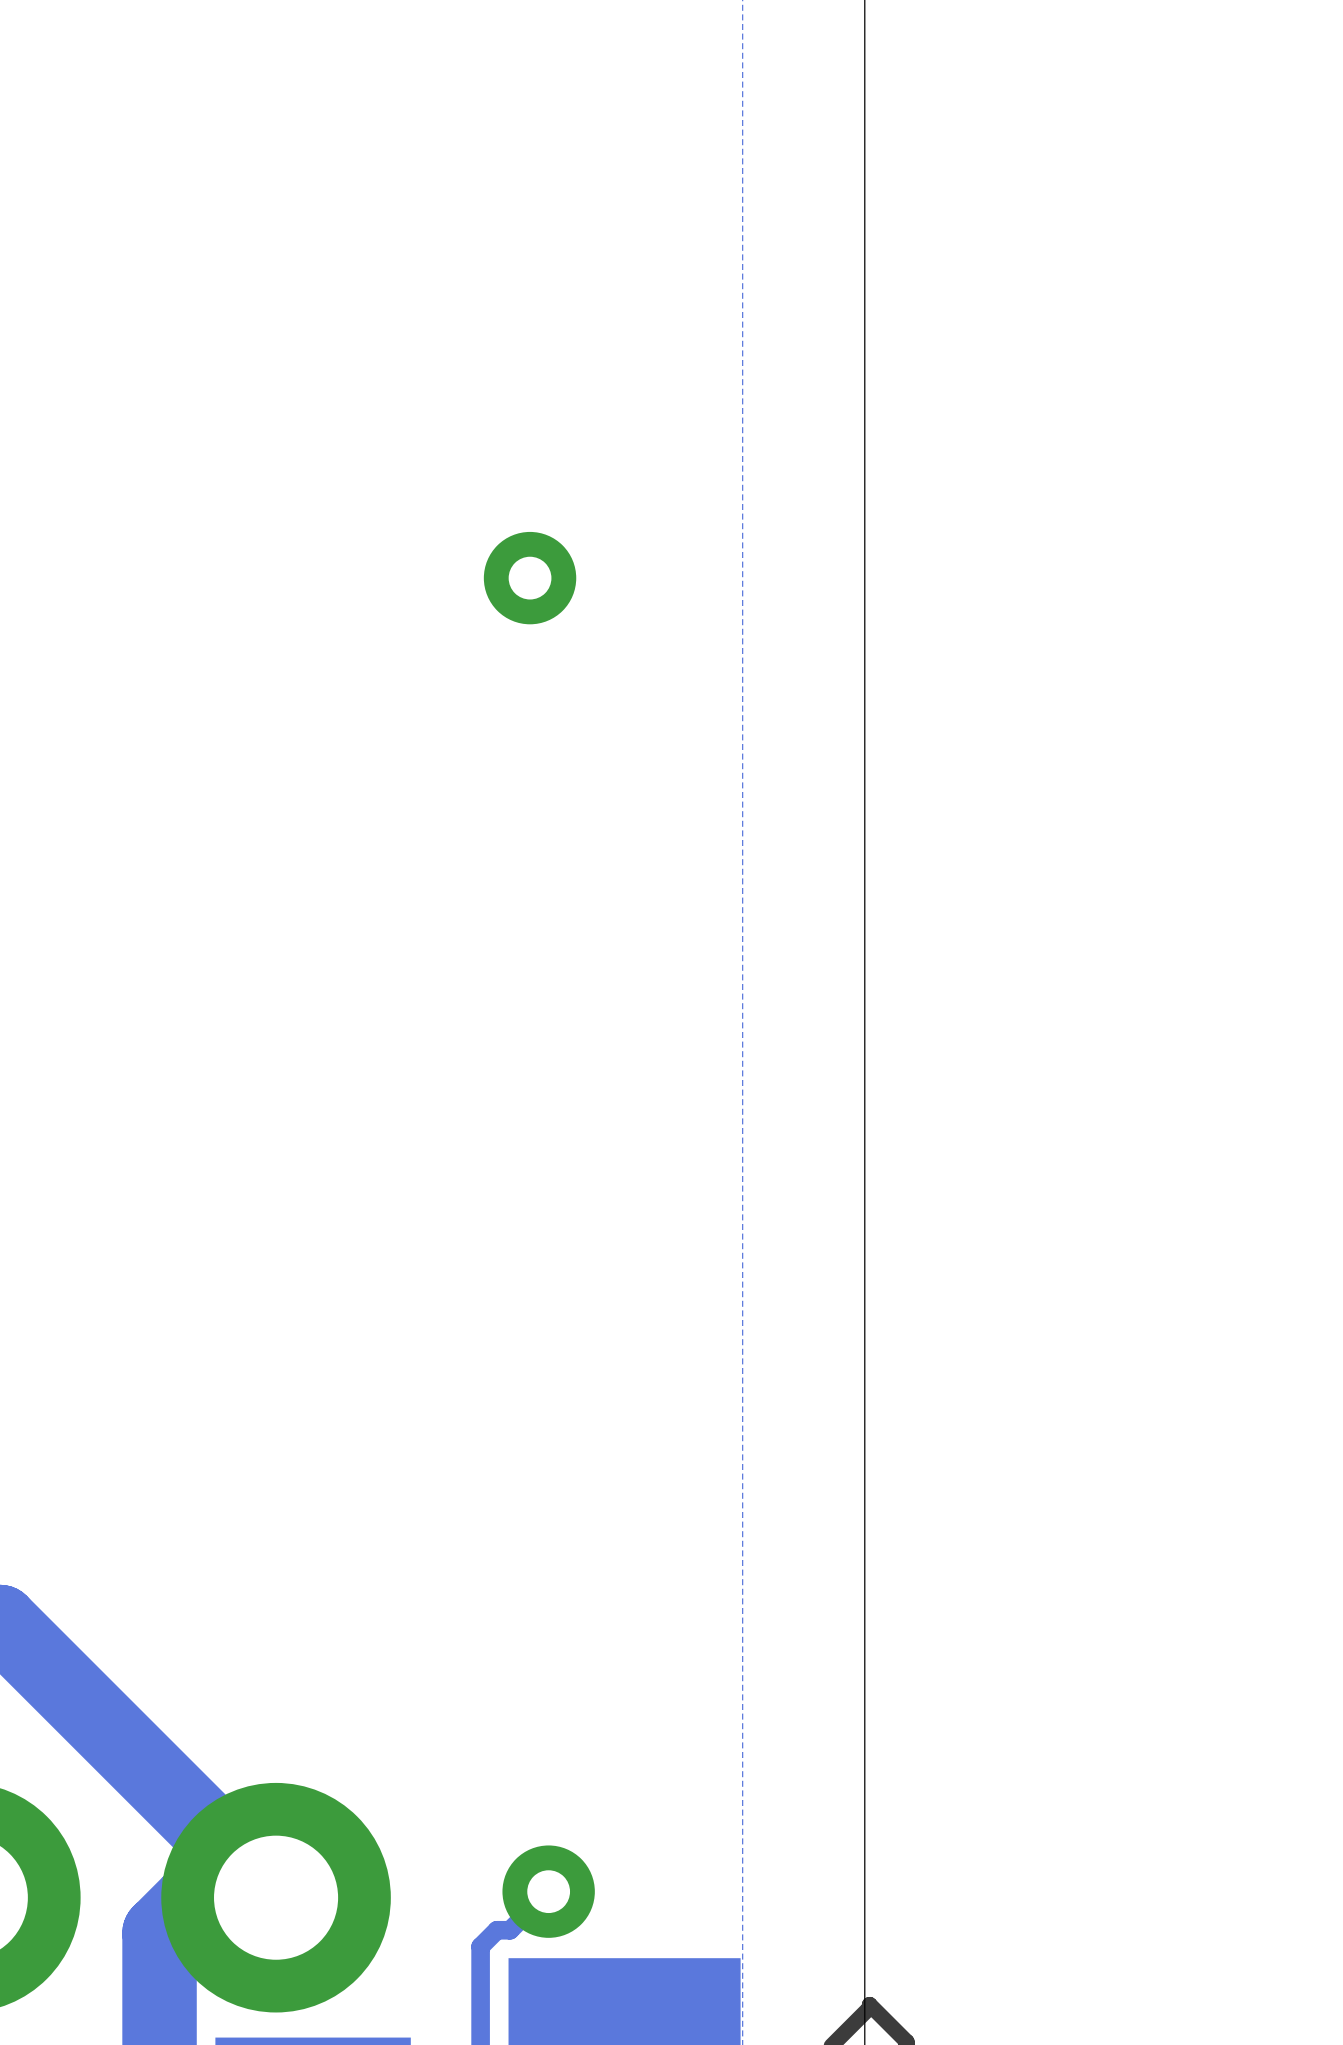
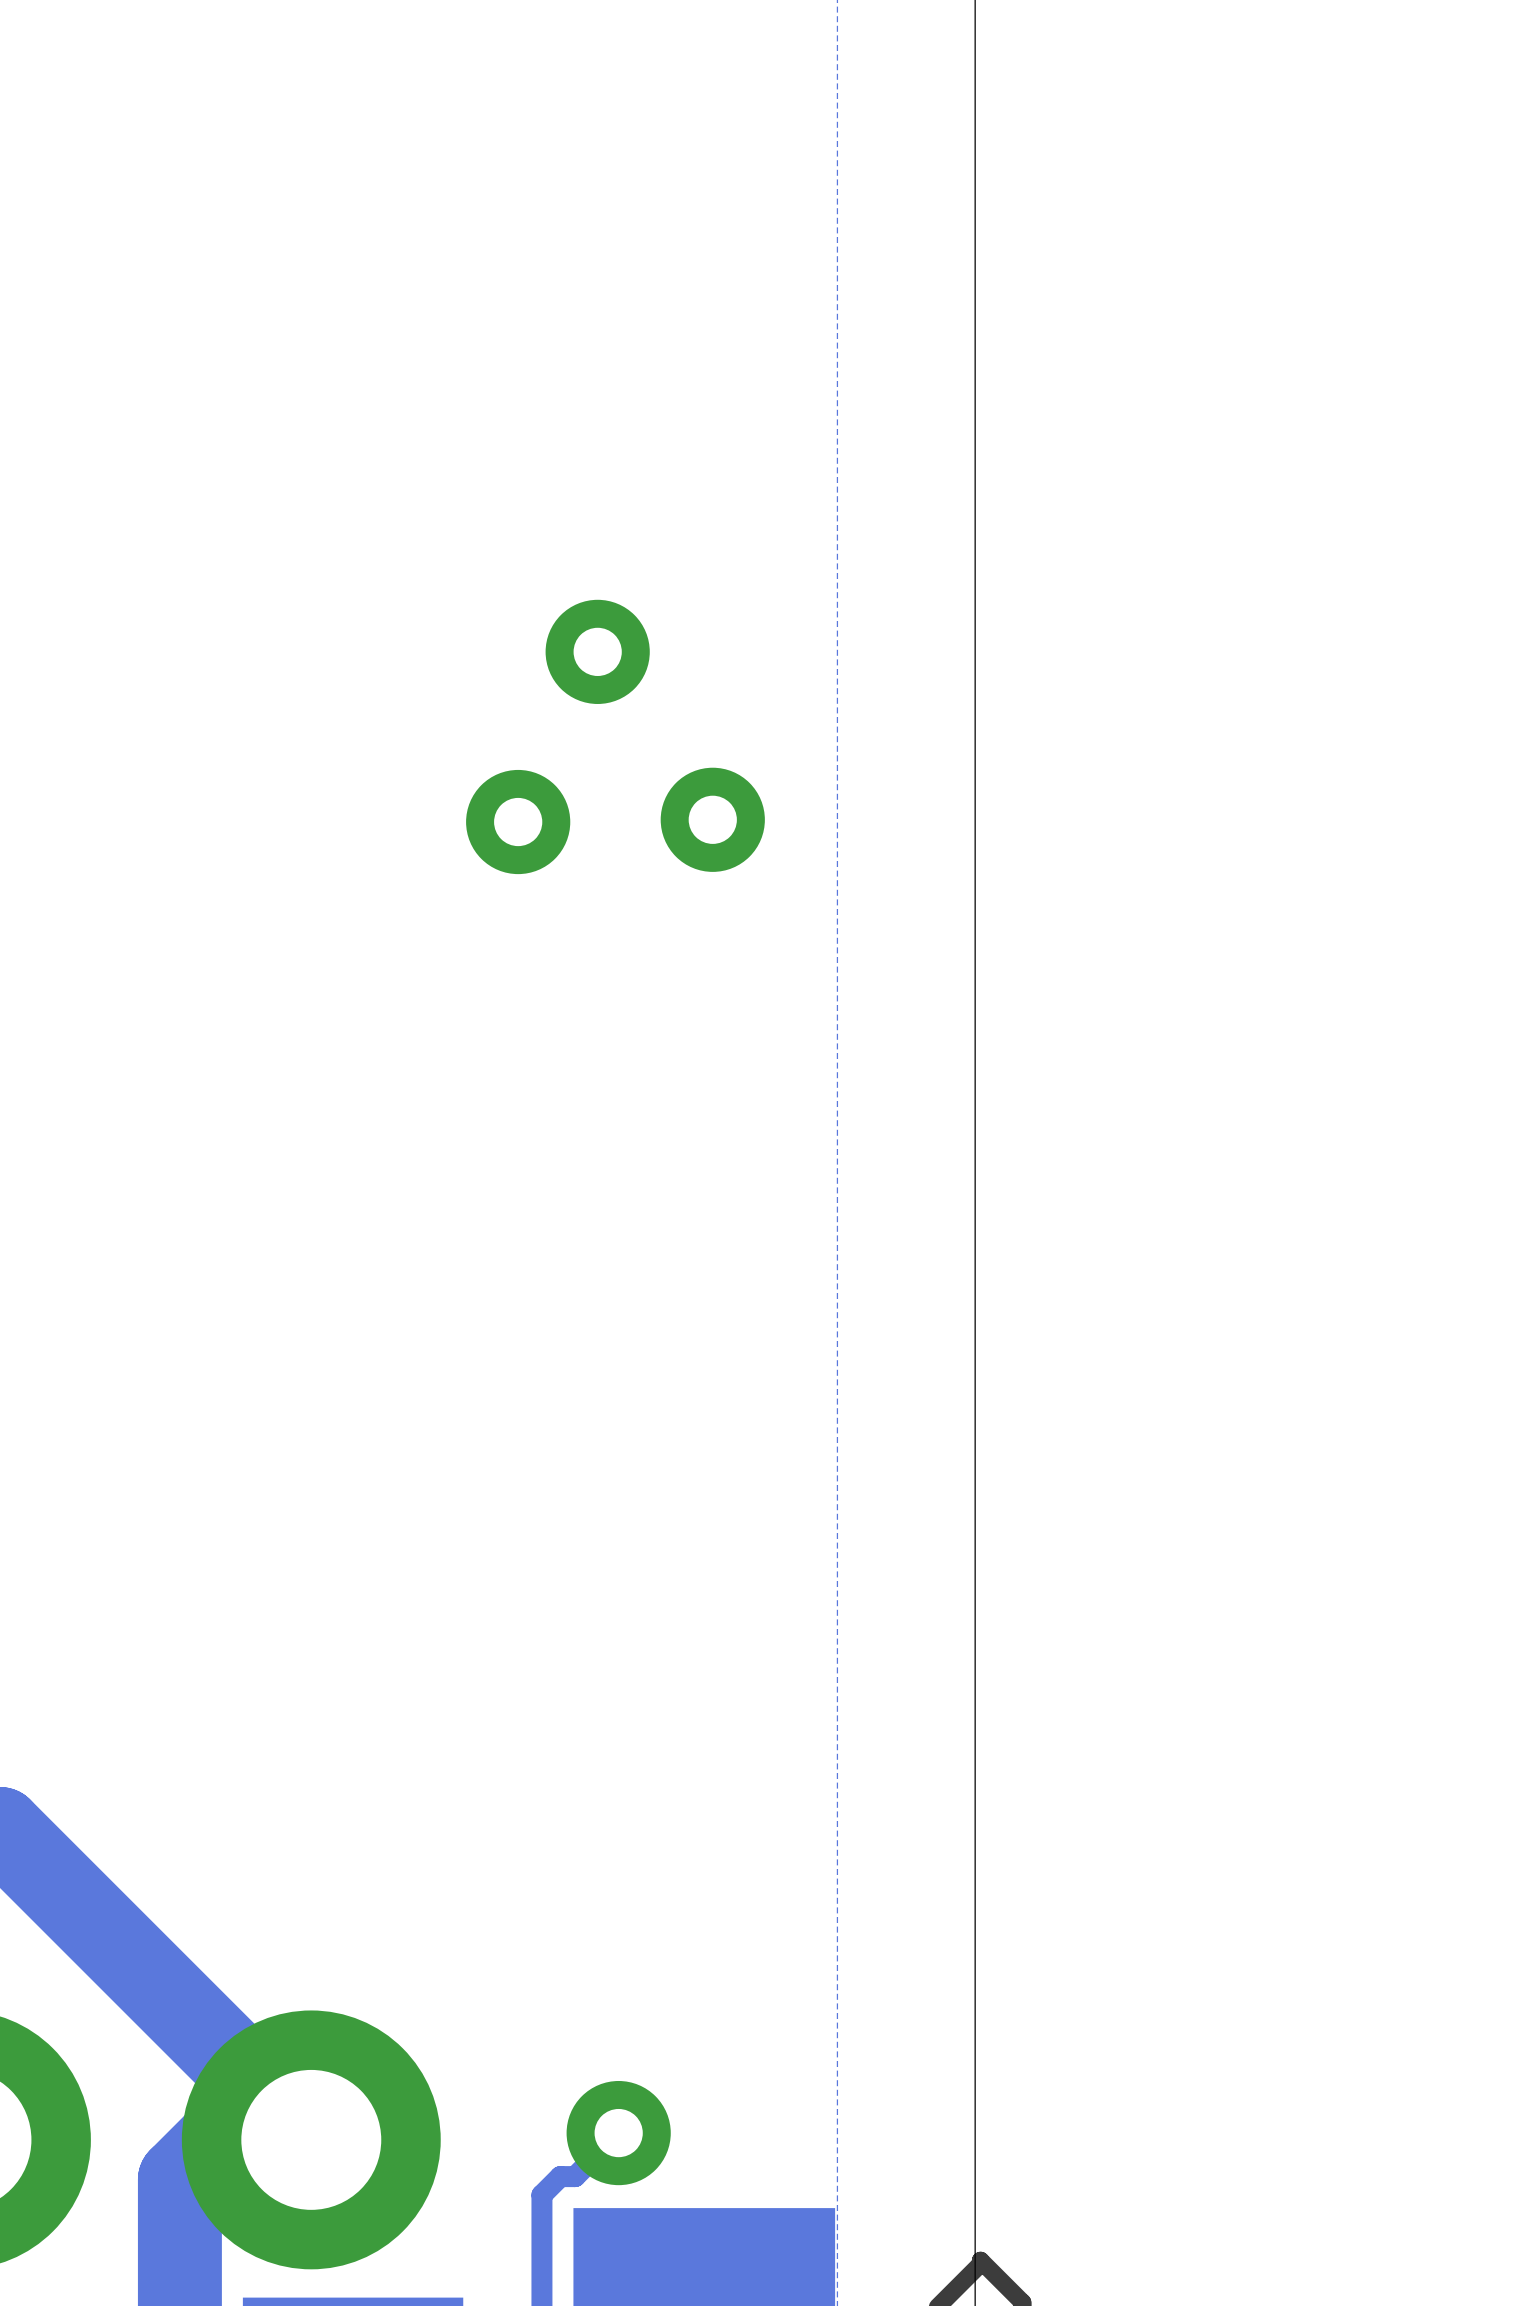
via: none -> (712, 819)
via: none -> (518, 822)

